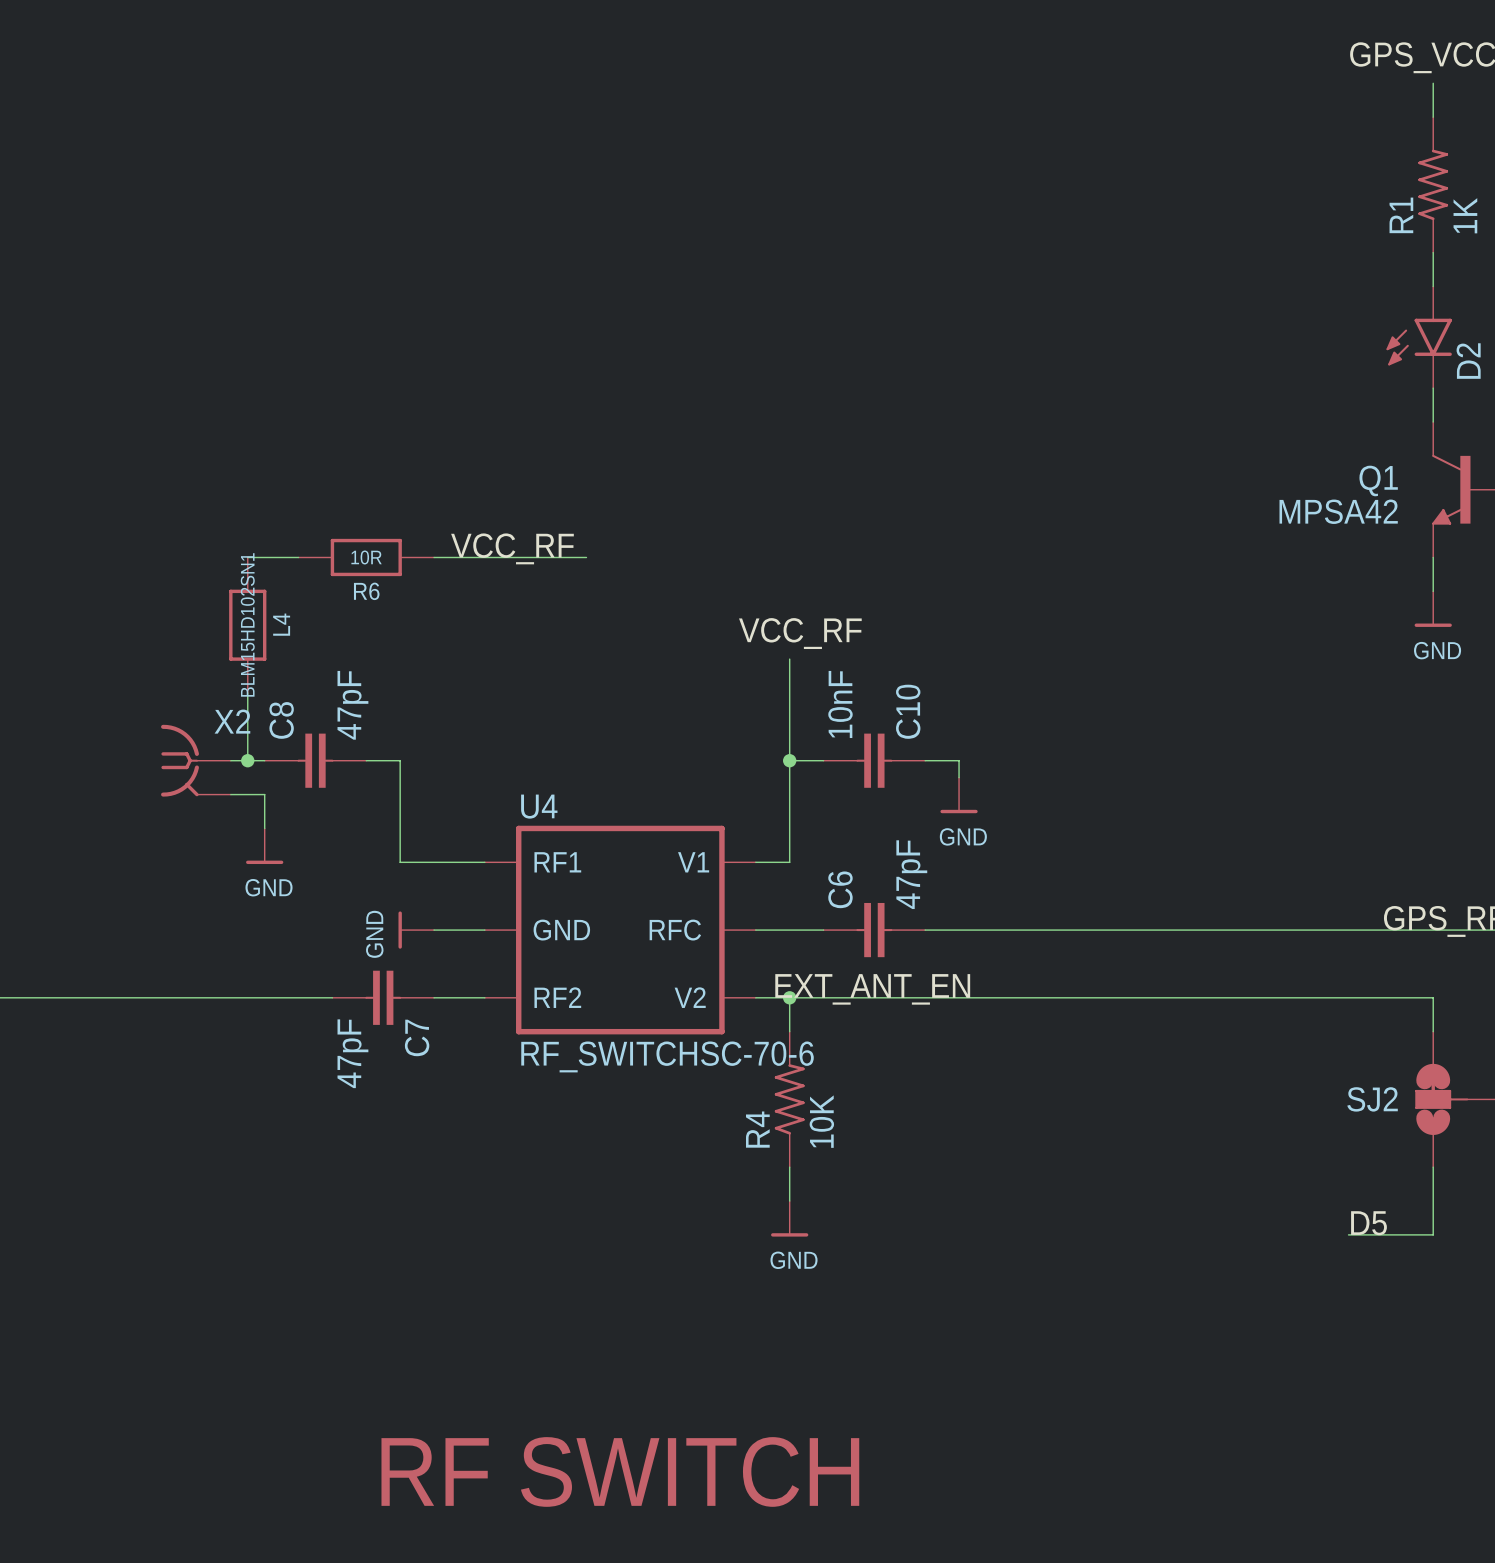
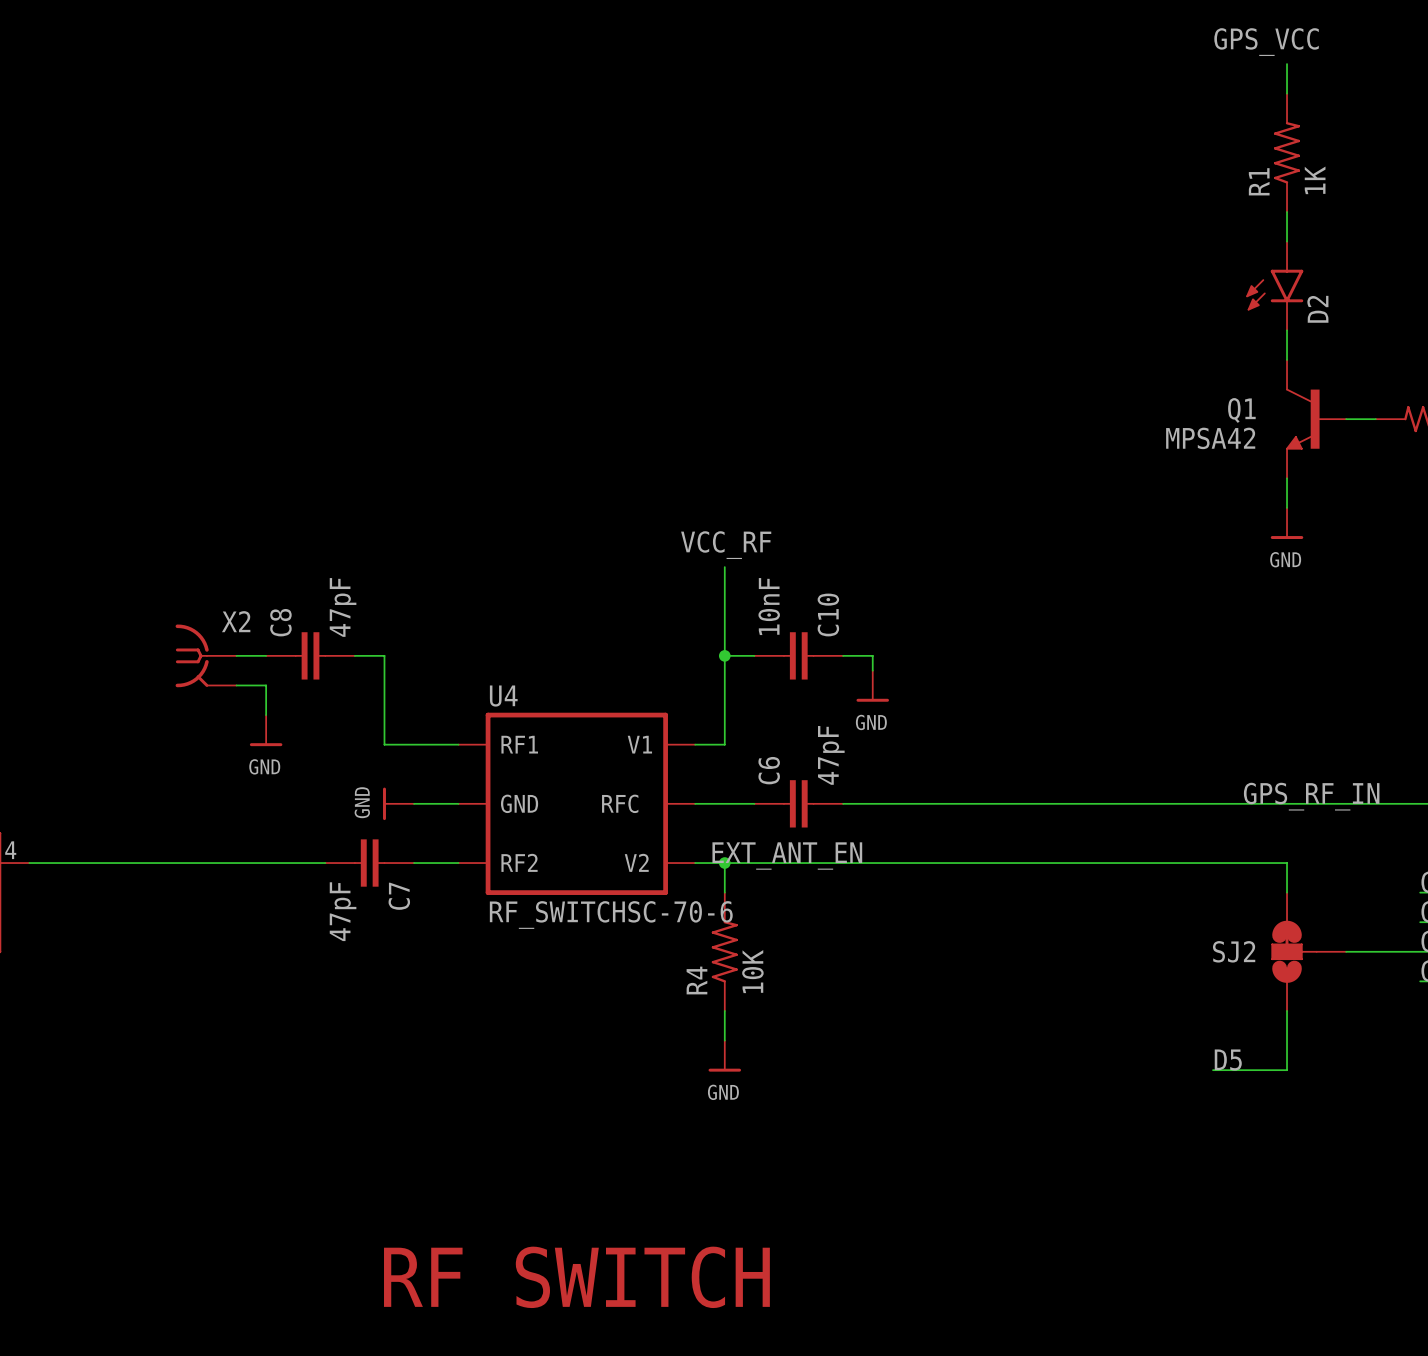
label: VCC_RF (512, 548) -> none
wire: (247, 557) (298, 557) -> none
R6: 10R (366, 557) -> none
wire: (434, 557) (586, 557) -> none
L4: BLM15HD102SN1 (247, 625) -> none
wire: (247, 692) (247, 760) -> none
junction: (247, 760) -> none

